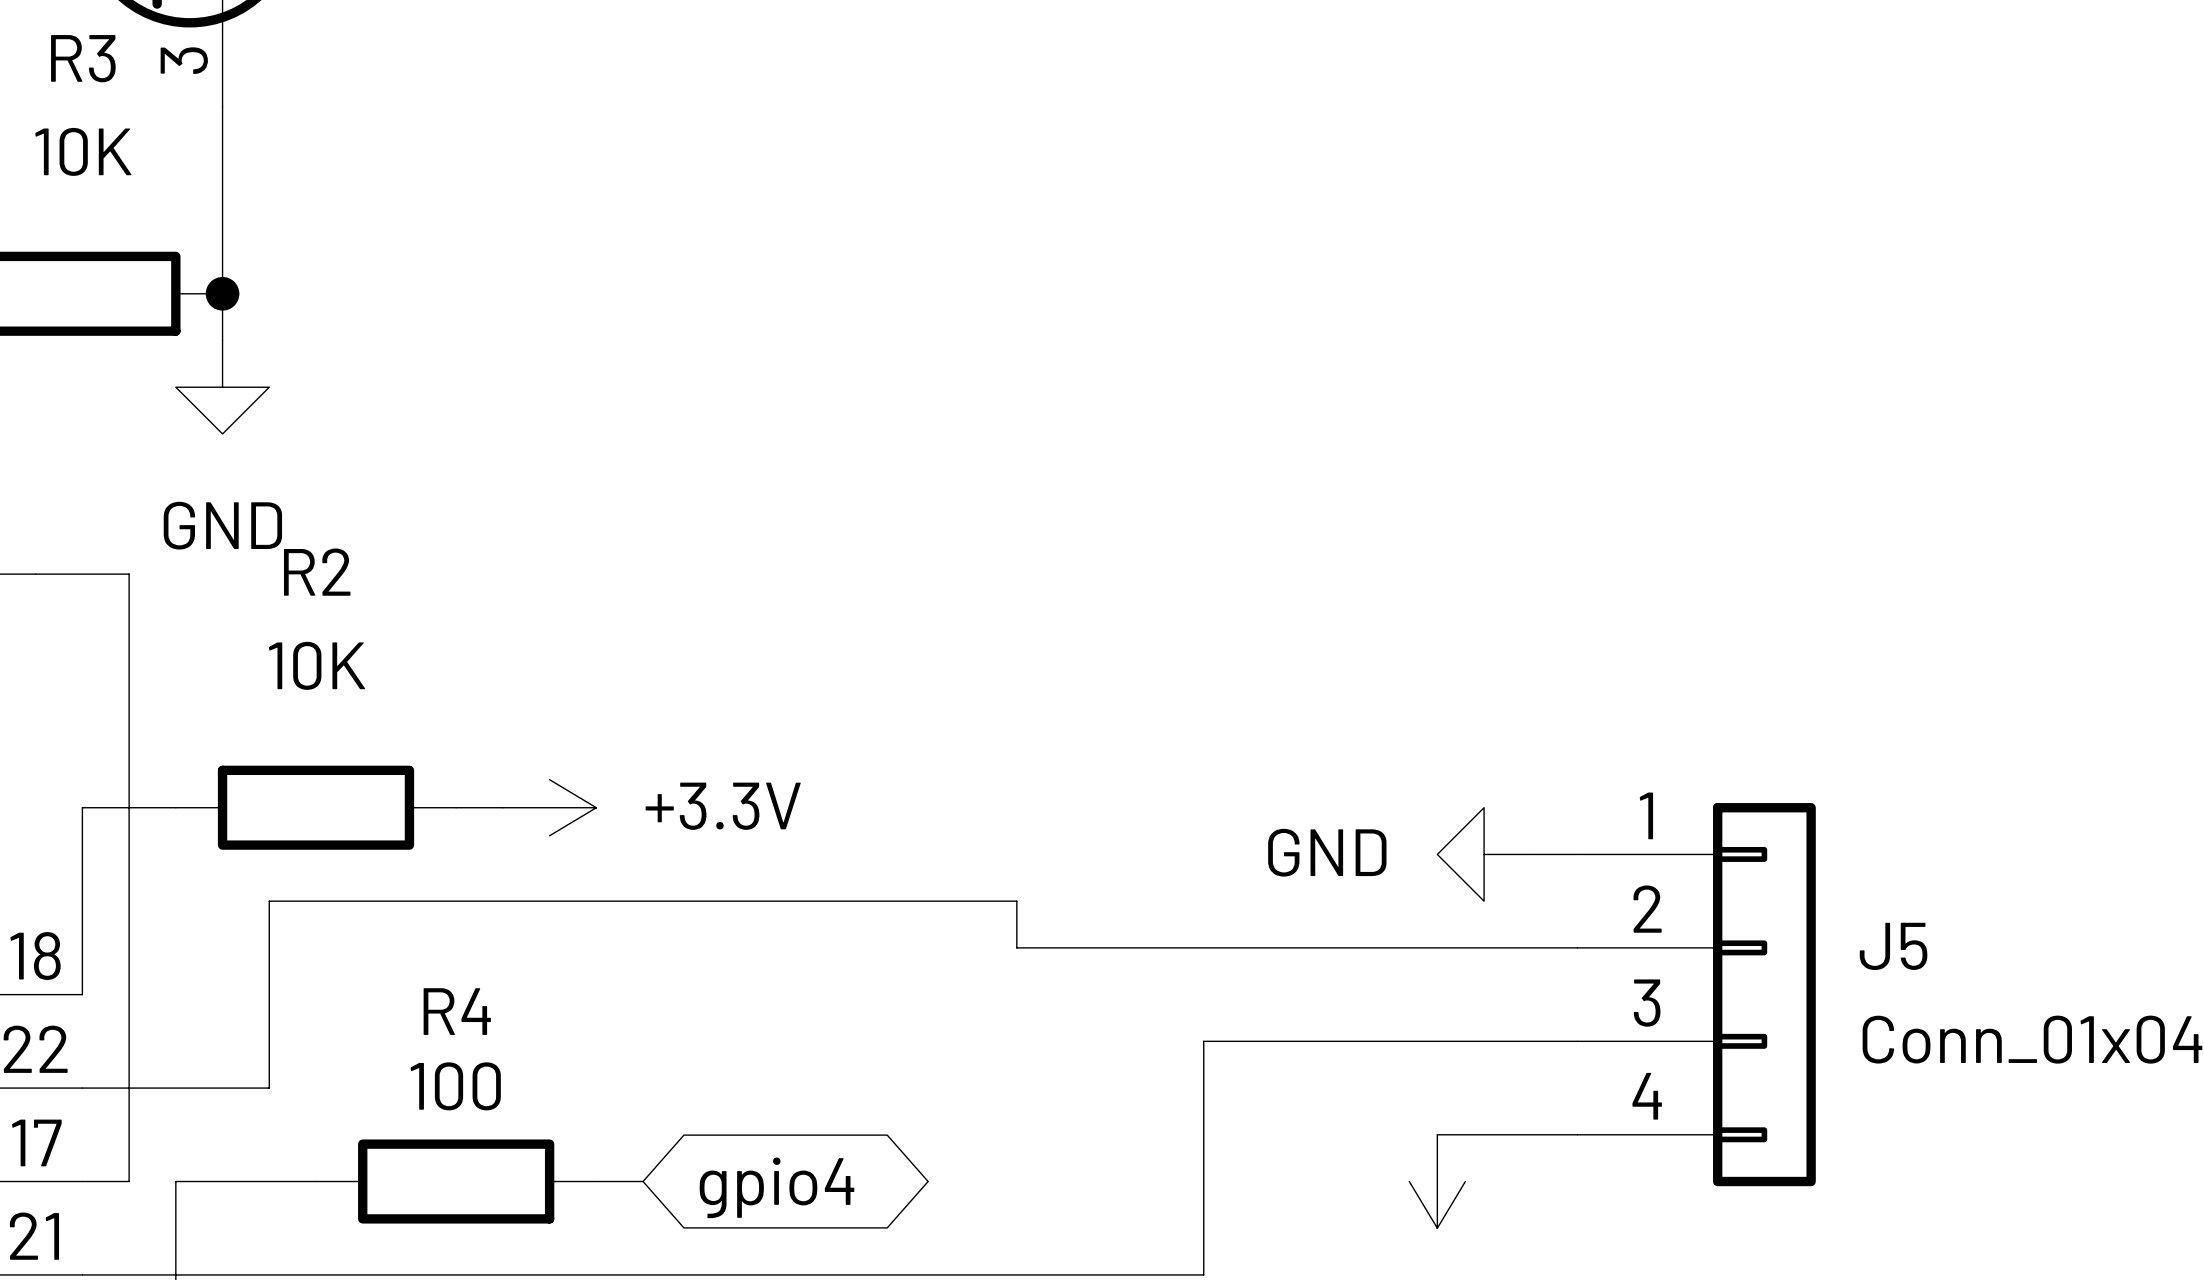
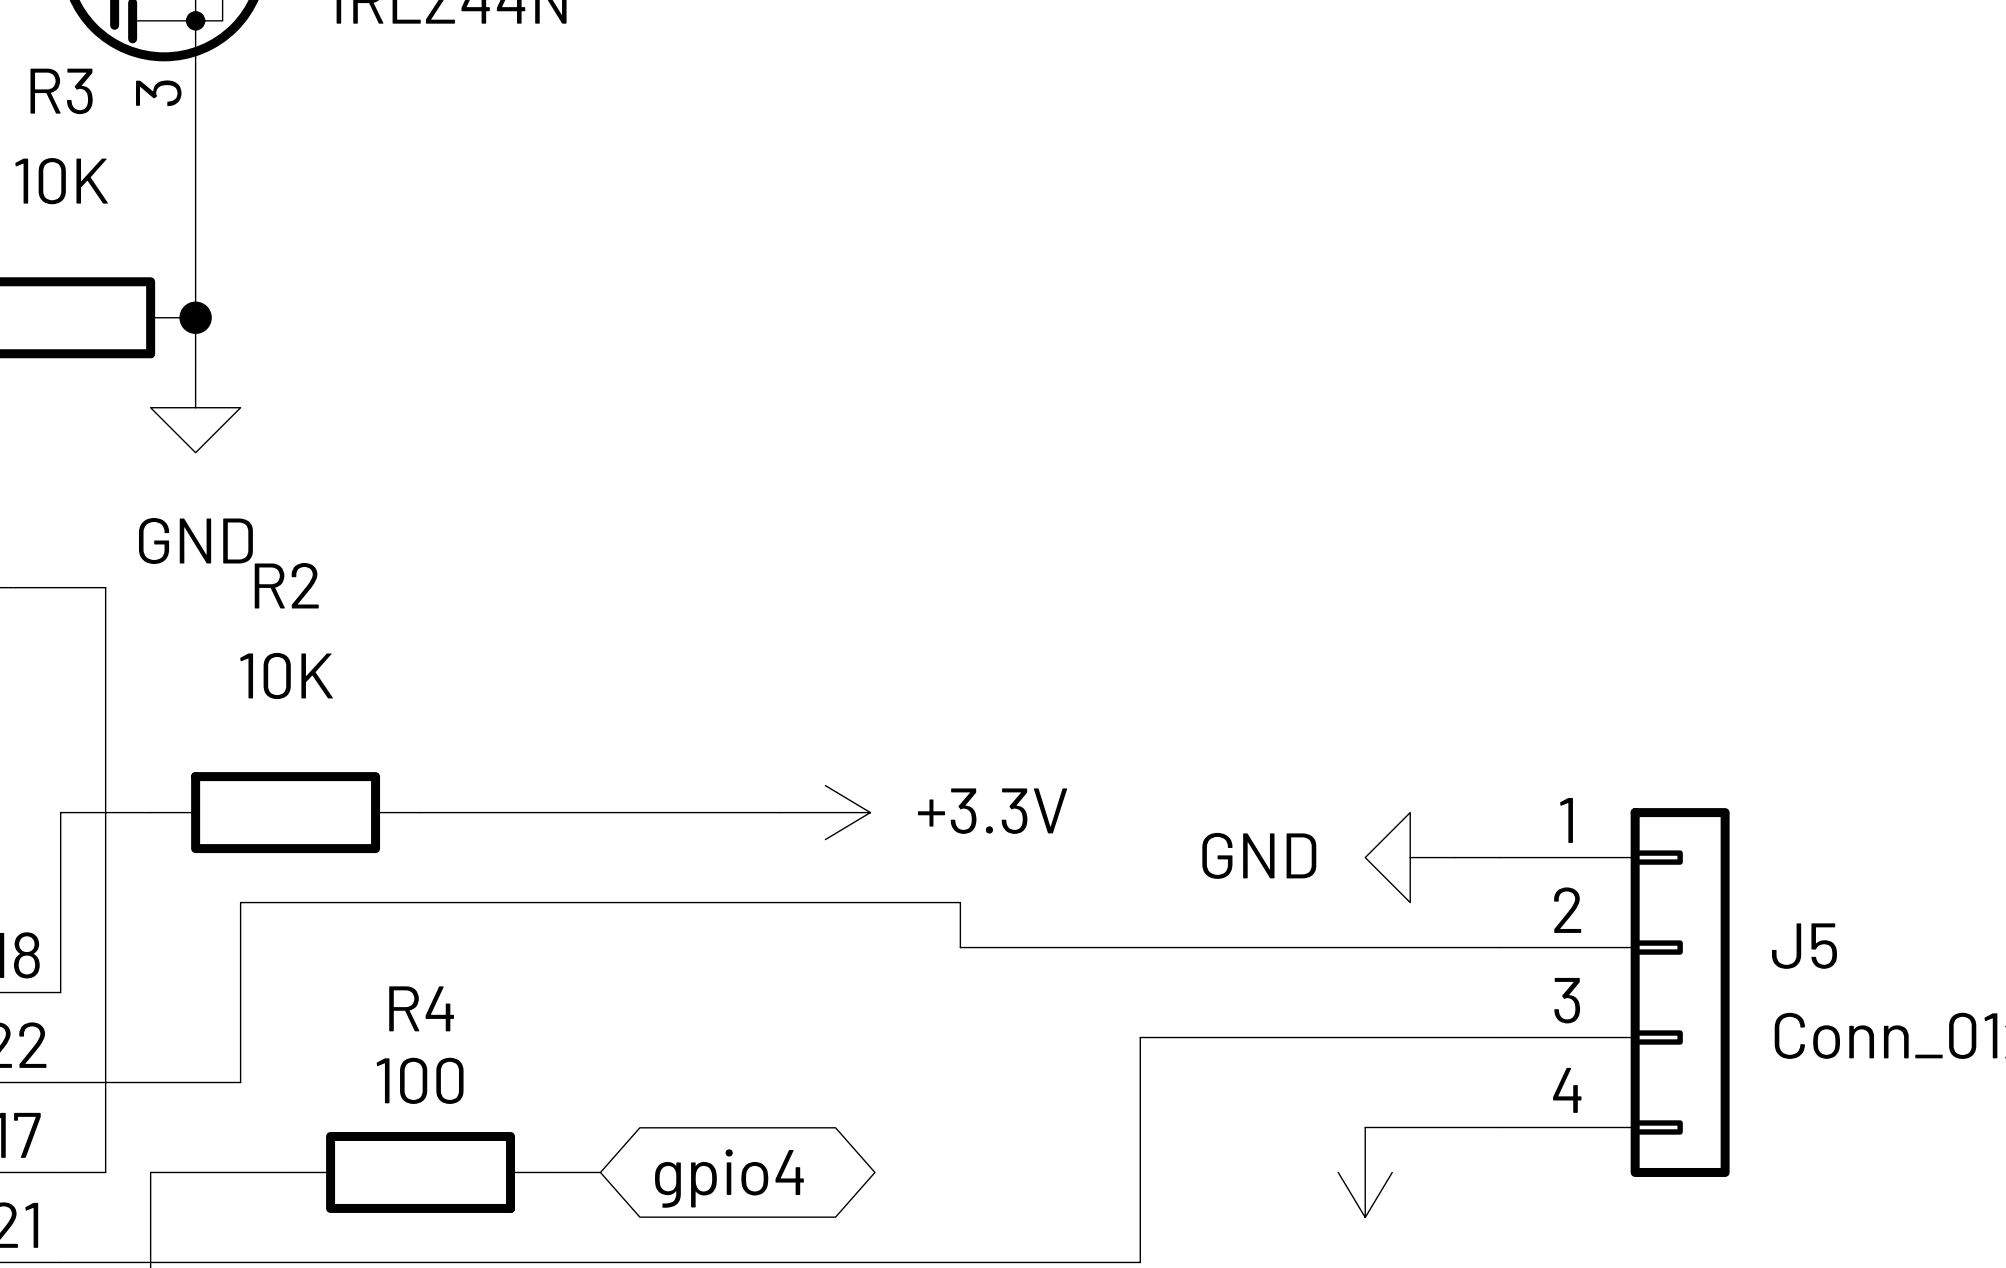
wire: none -> (465, 812) (780, 812)
power symbol position: +3.3V (549, 807) -> +3.3V (825, 812)

